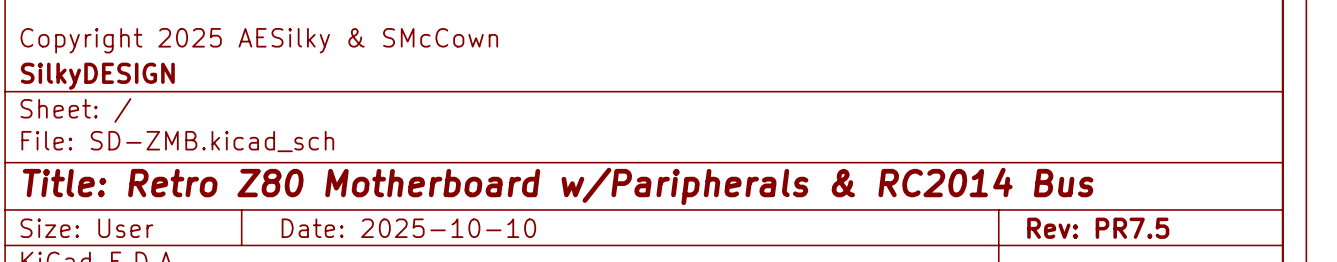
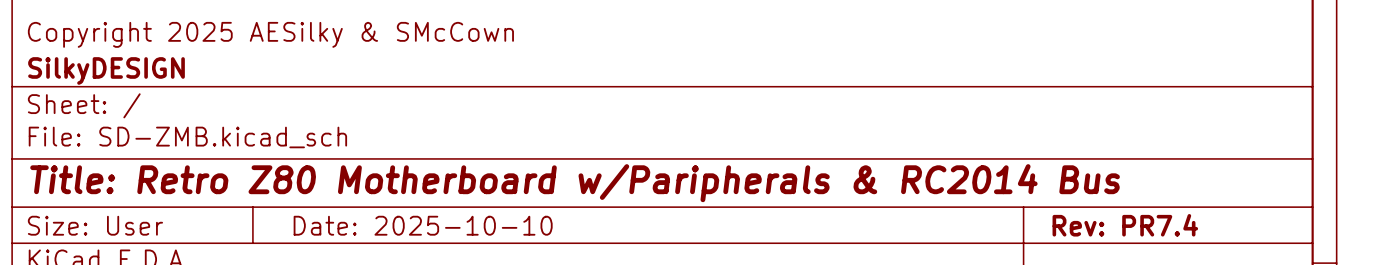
title block: Rev: PR7.5 (1098, 228) -> Rev: PR7.4 (1125, 225)

